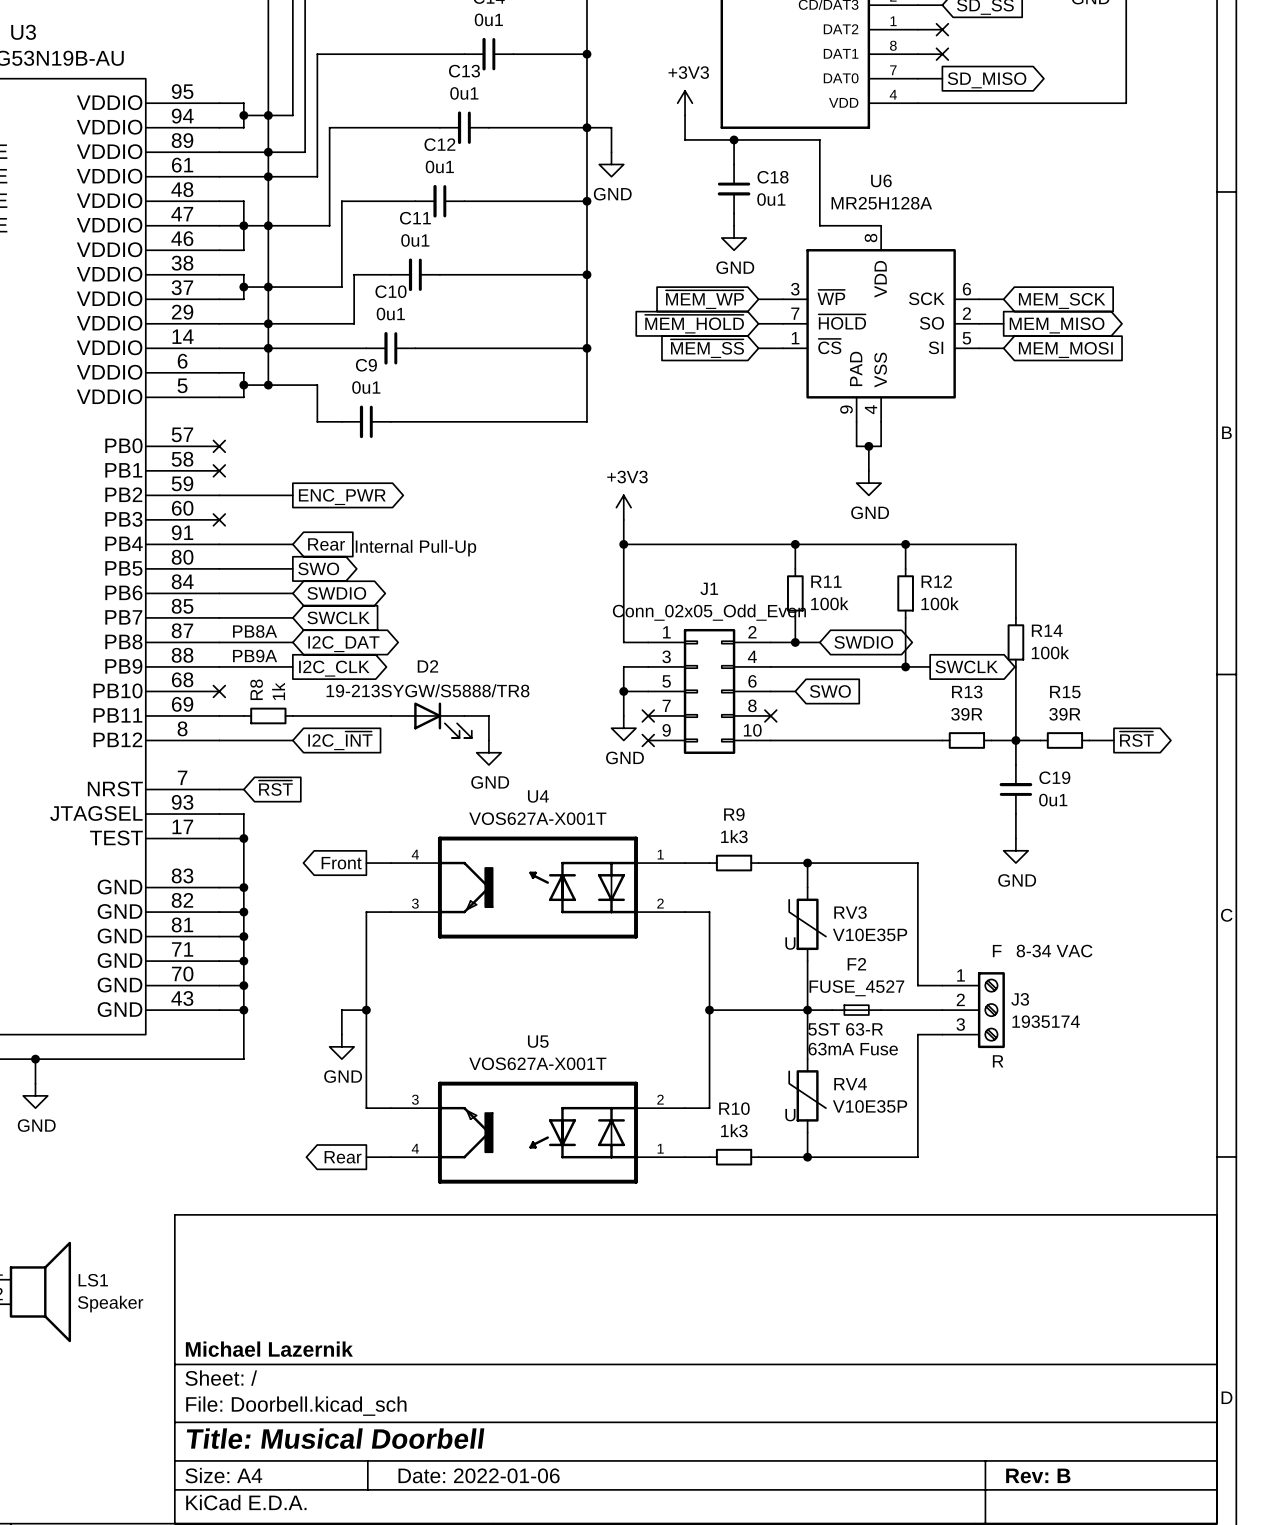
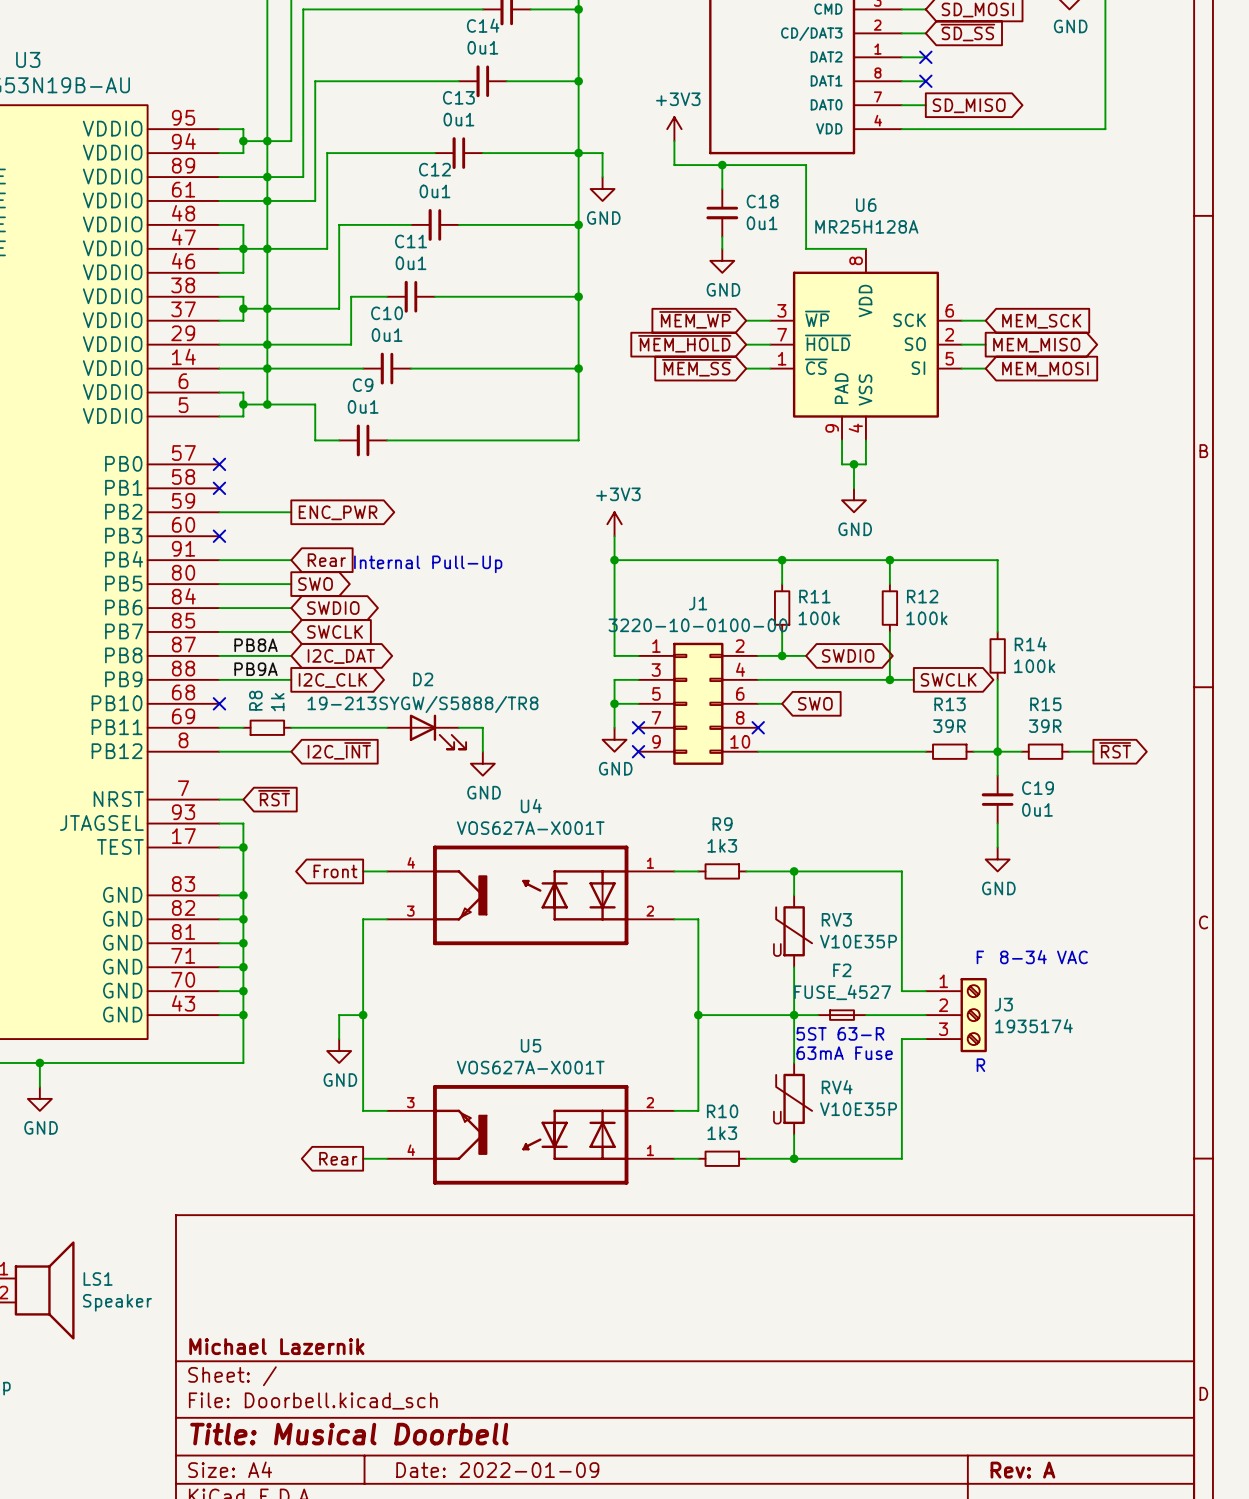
J1 value: Conn_02x05_Odd_Even (709, 612) -> 3220-10-0100-00 (698, 625)
title block: Date: 2022-01-06 (479, 1475) -> Date: 2022-01-09 (497, 1470)
title block: Rev: B (1038, 1475) -> Rev: A (1022, 1470)

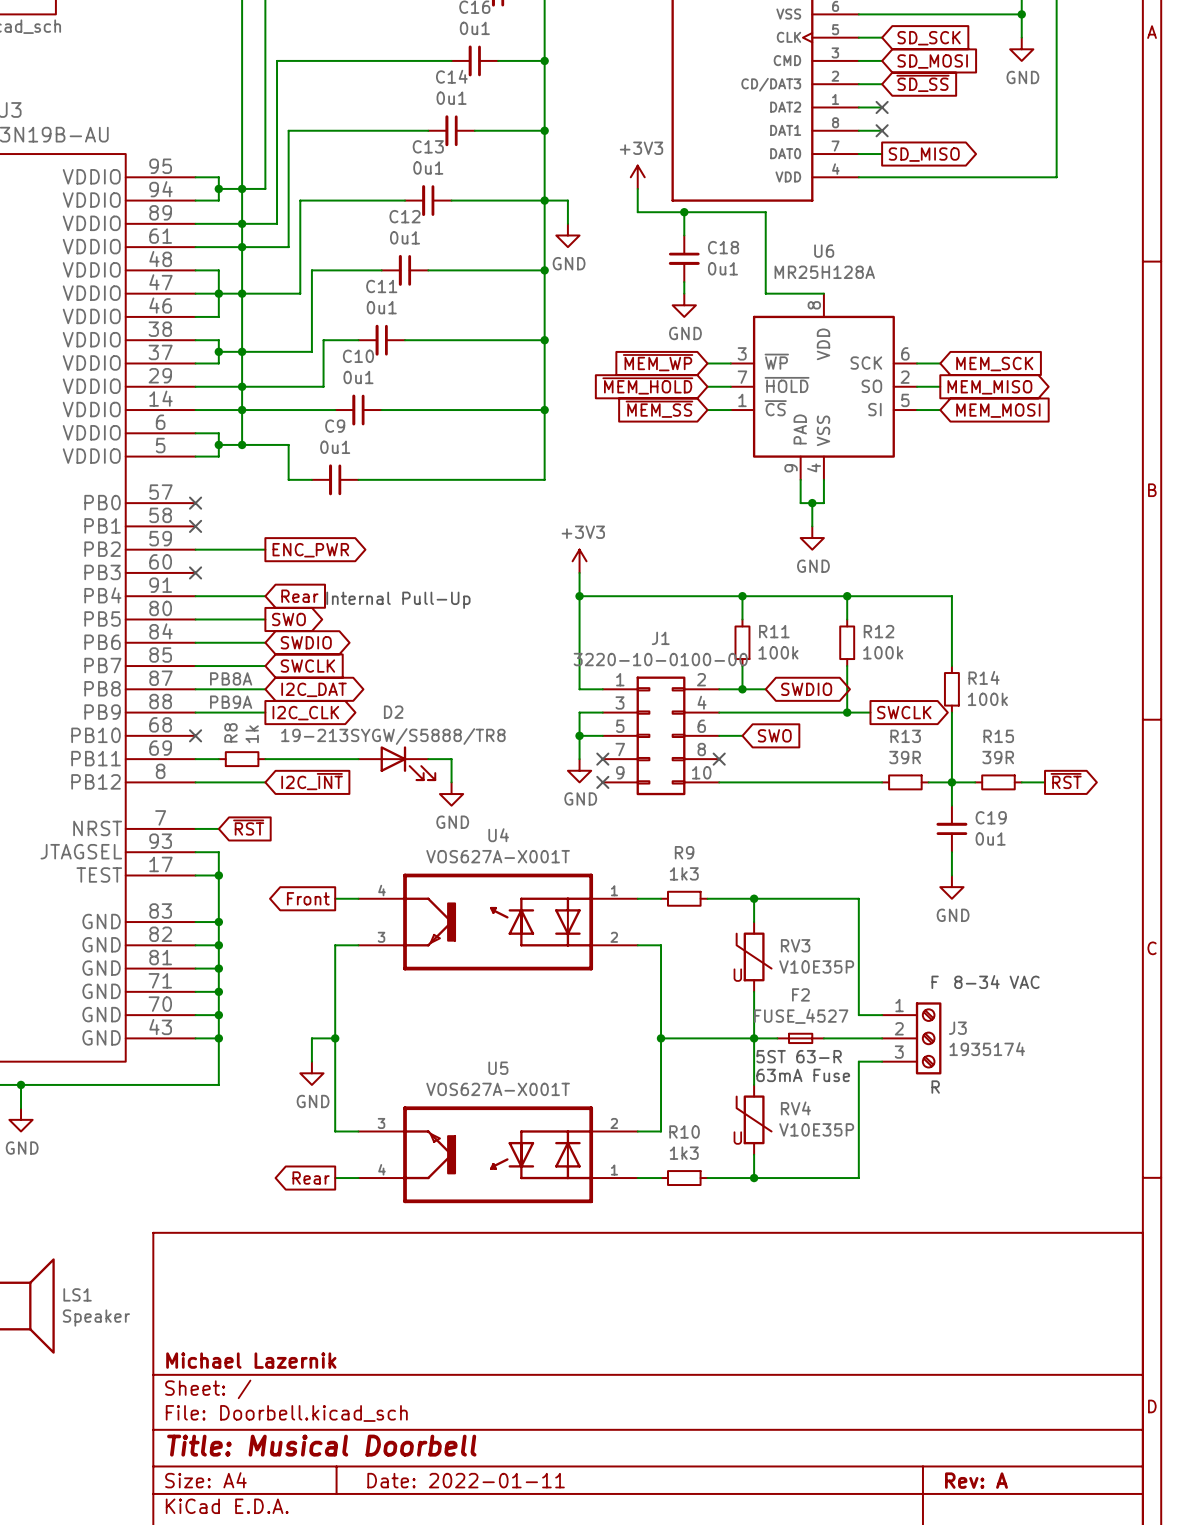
title block: Date: 2022-01-09 (497, 1470) -> Date: 2022-01-11 (466, 1480)

